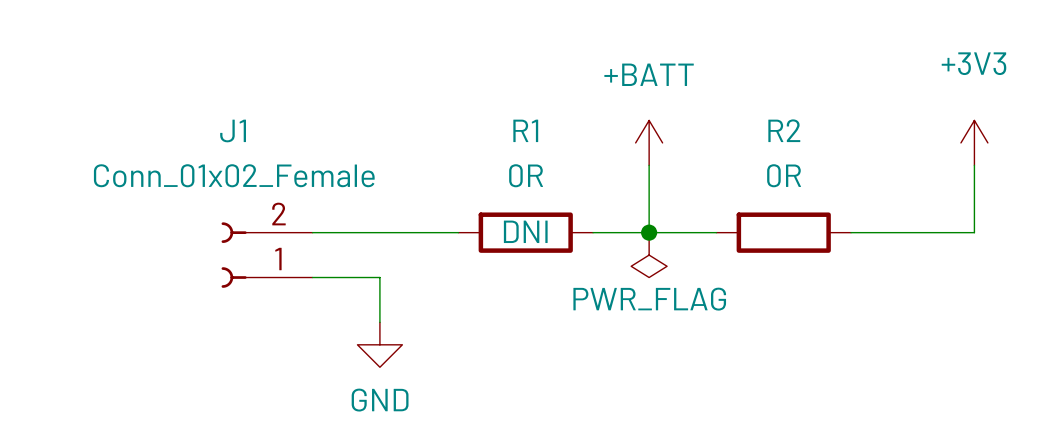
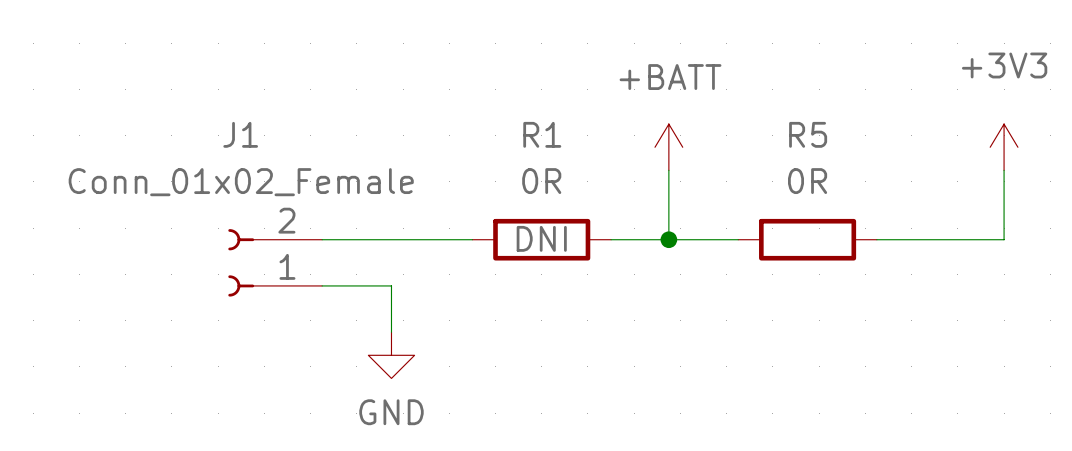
R2 name: R2 (784, 130) -> R5 (808, 134)
power symbol: PWR_FLAG (649, 255) -> none

